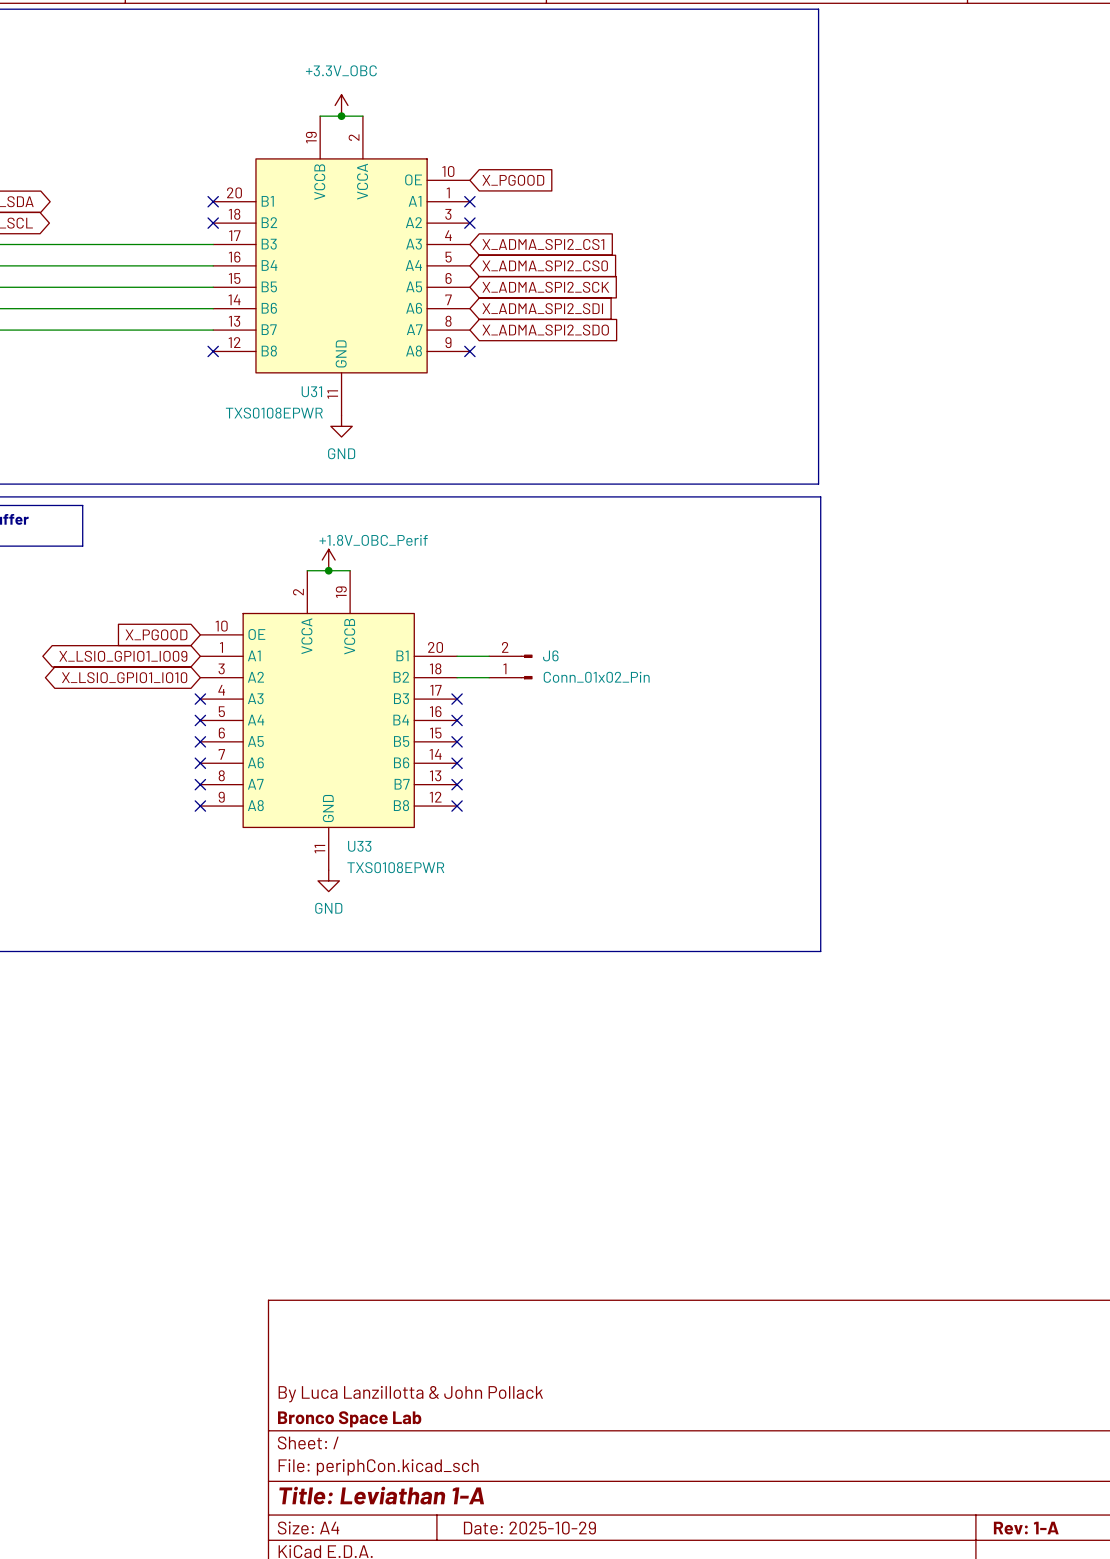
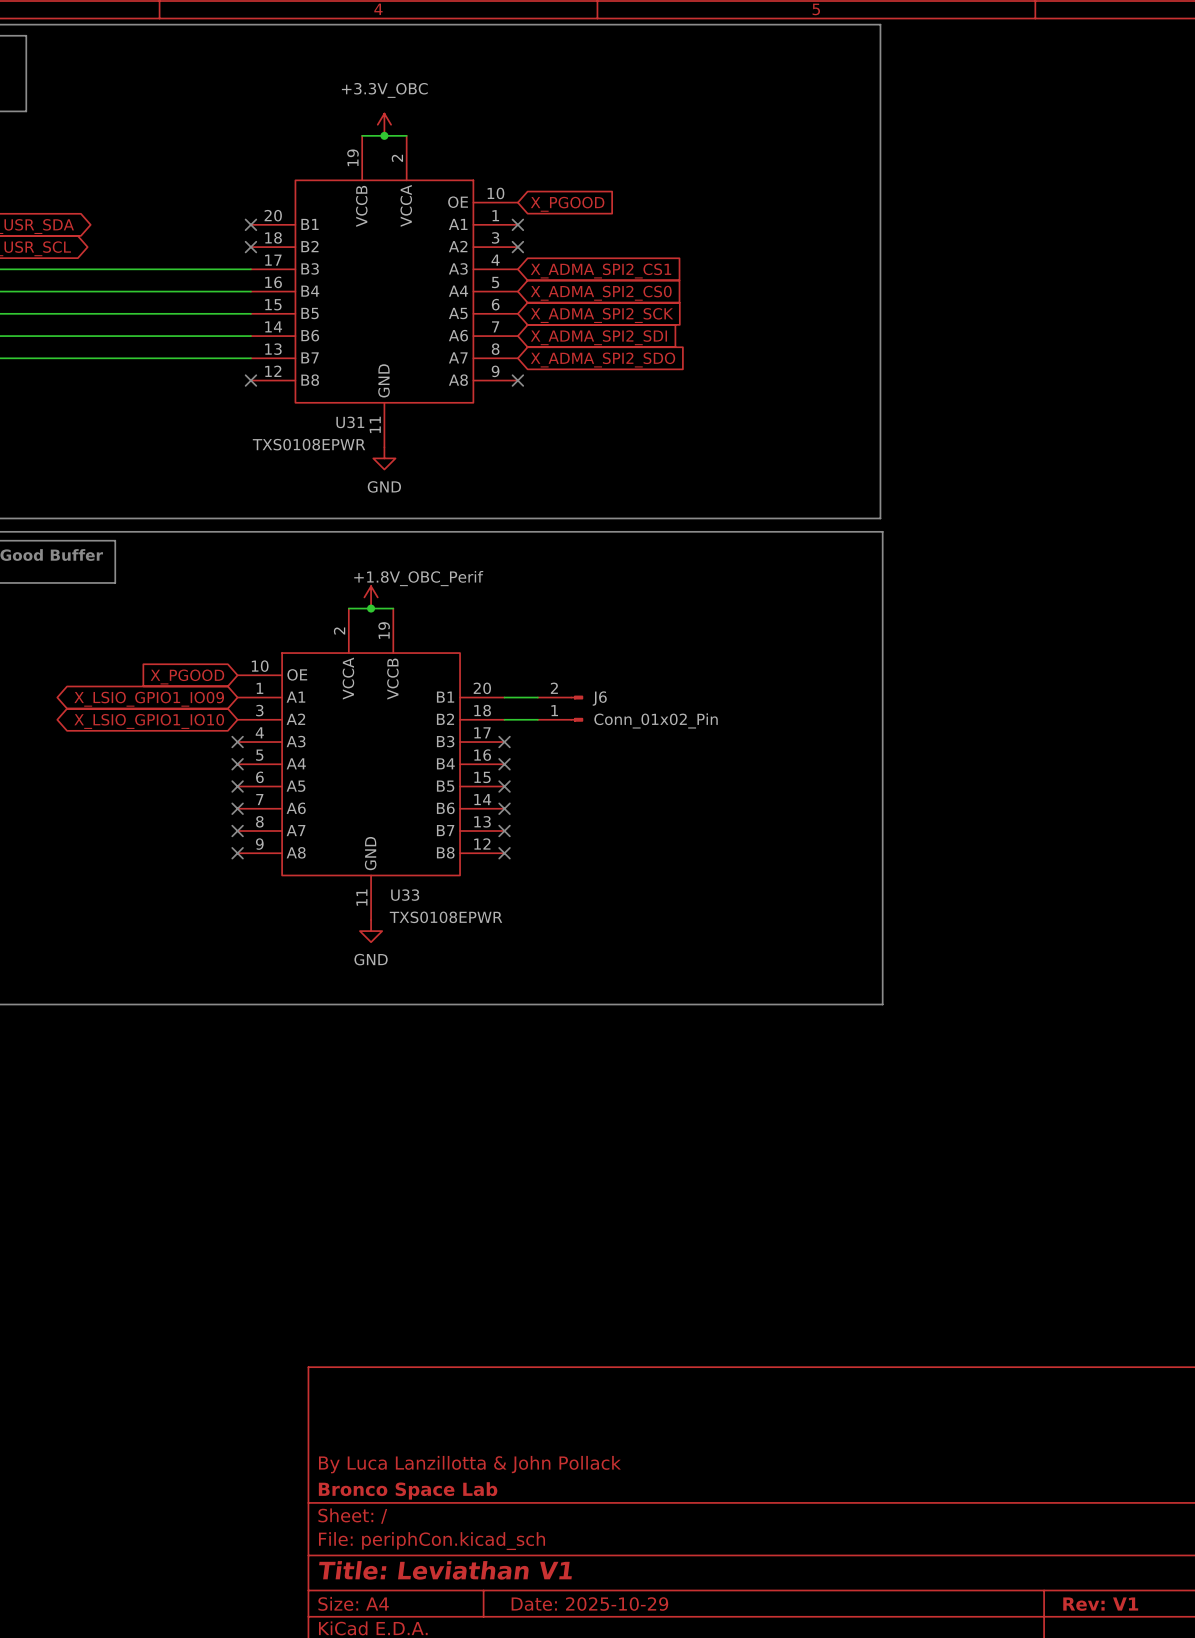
title block: Title: Leviathan 1-A (381, 1495) -> Title: Leviathan V1 (445, 1570)
title block: Rev: 1-A (1026, 1528) -> Rev: V1 (1100, 1604)

